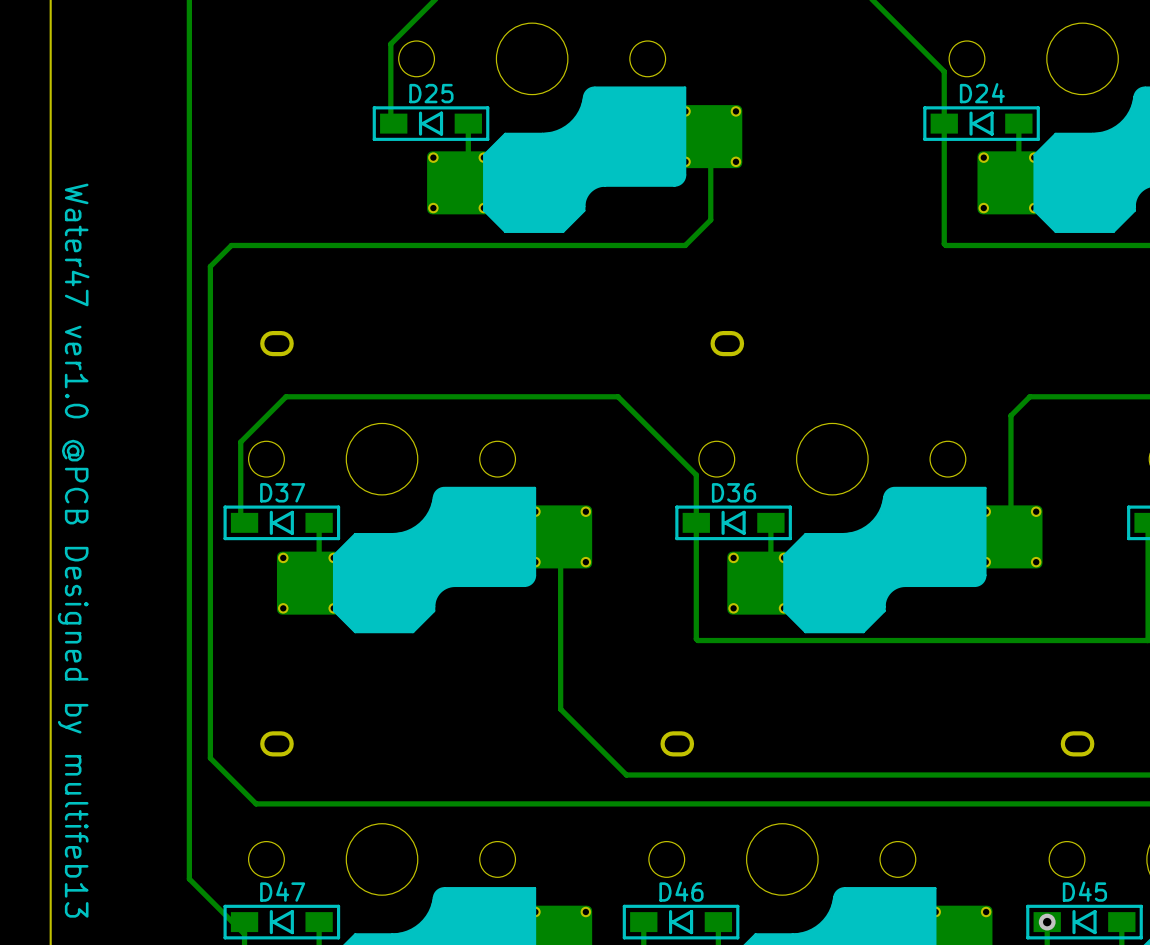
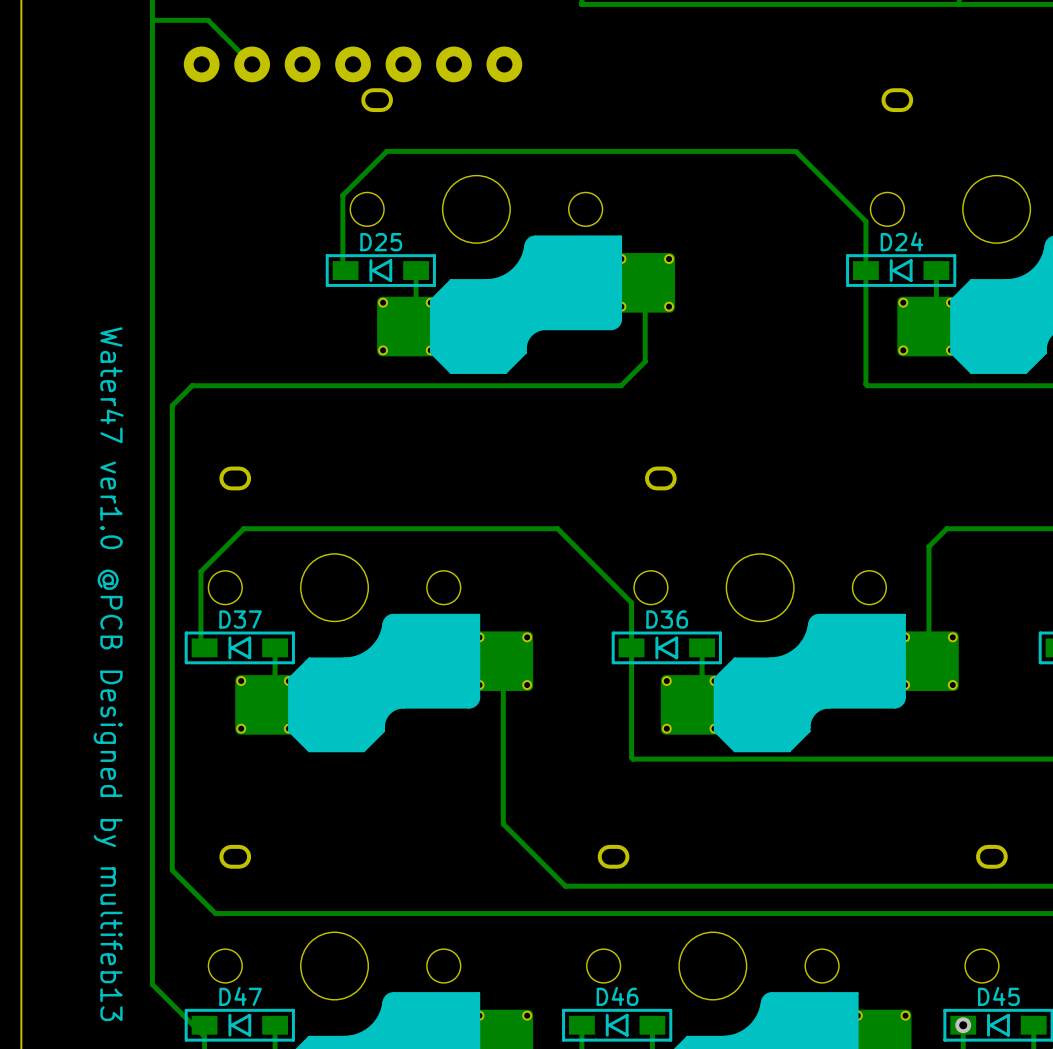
text position: Water47 ver1.0 @PCB Designed by multifeb13 (73, 550) -> Water47 ver1.0 @PCB Designed by multifeb13 (108, 674)

